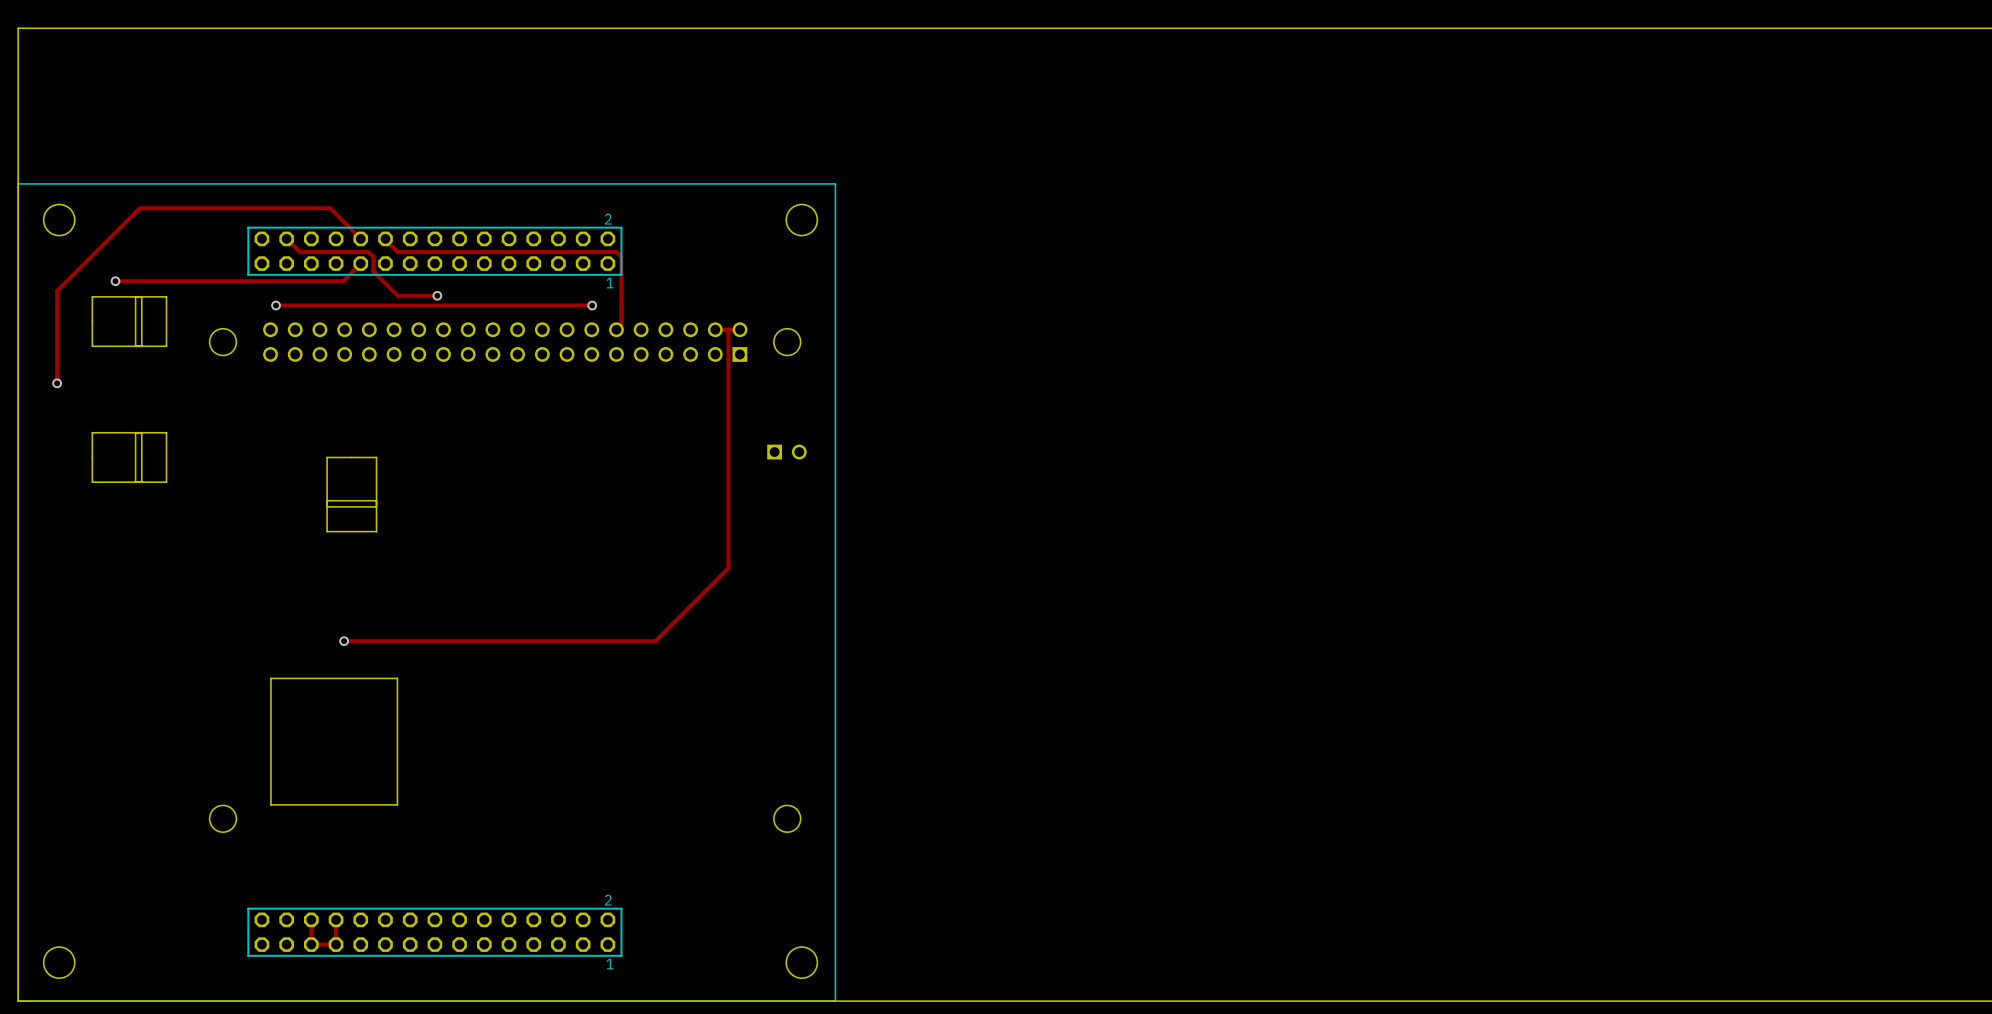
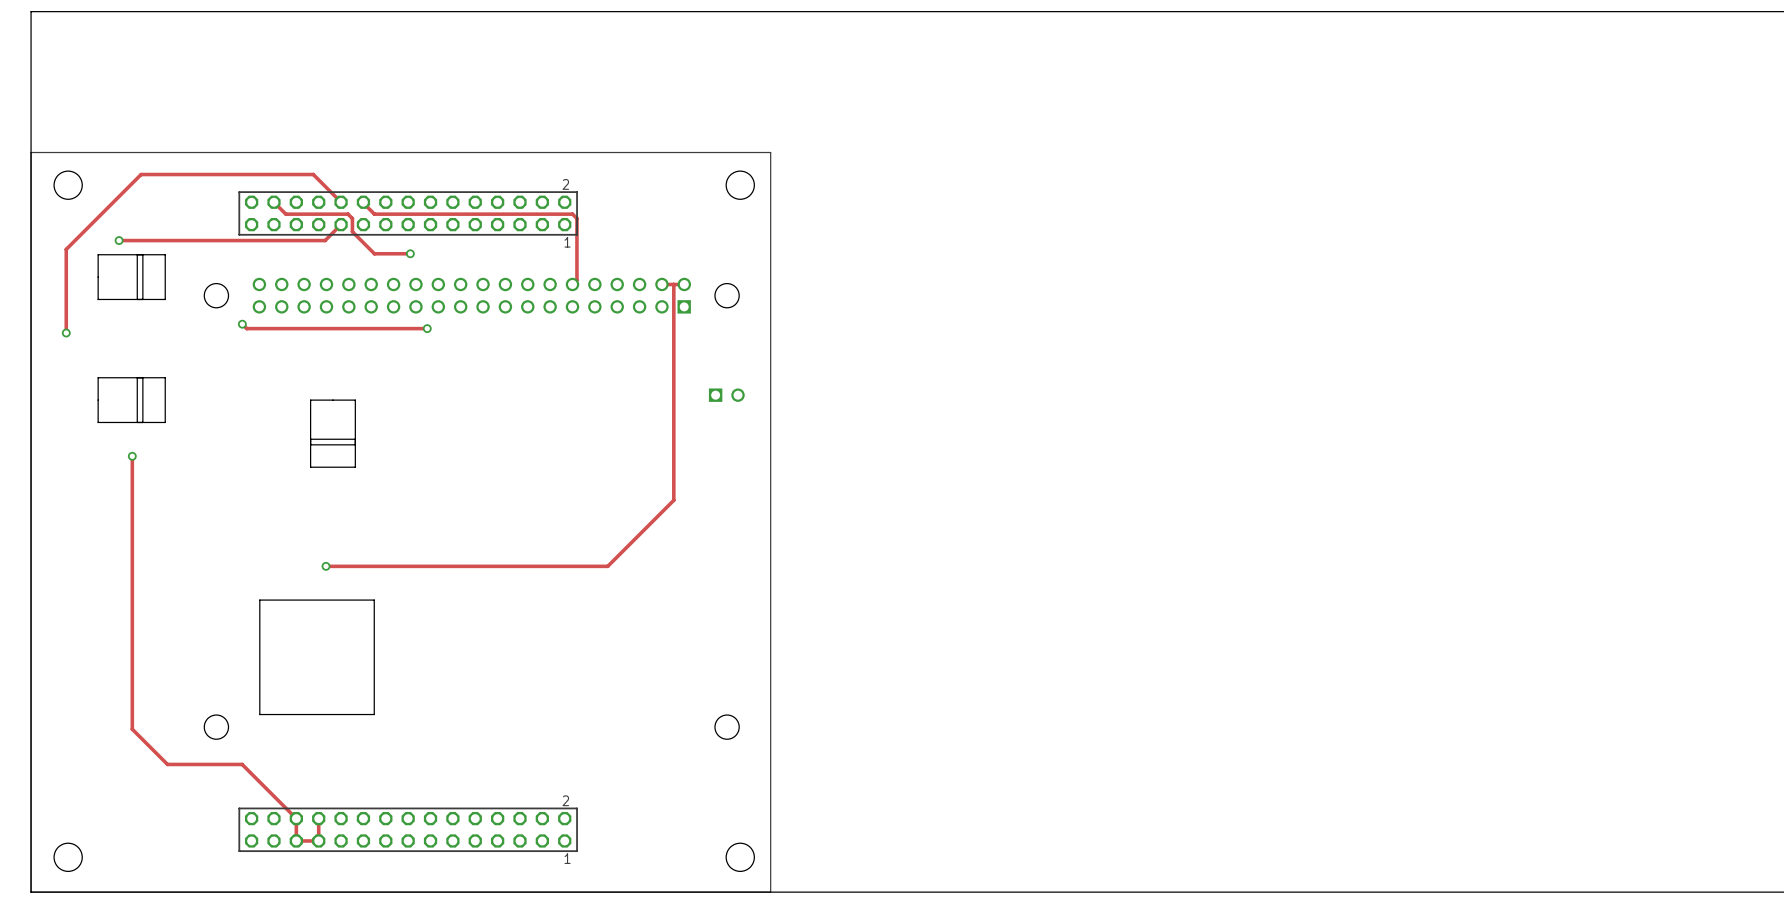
track: (276, 305) (592, 305) -> none
via: (276, 305) -> none
via: (592, 305) -> none
track: none -> (242, 324) (246, 328) (427, 328)
via: none -> (242, 324)
via: none -> (427, 328)
track: none -> (132, 456) (132, 729) (167, 764) (242, 764) (296, 818)
via: none -> (132, 456)

